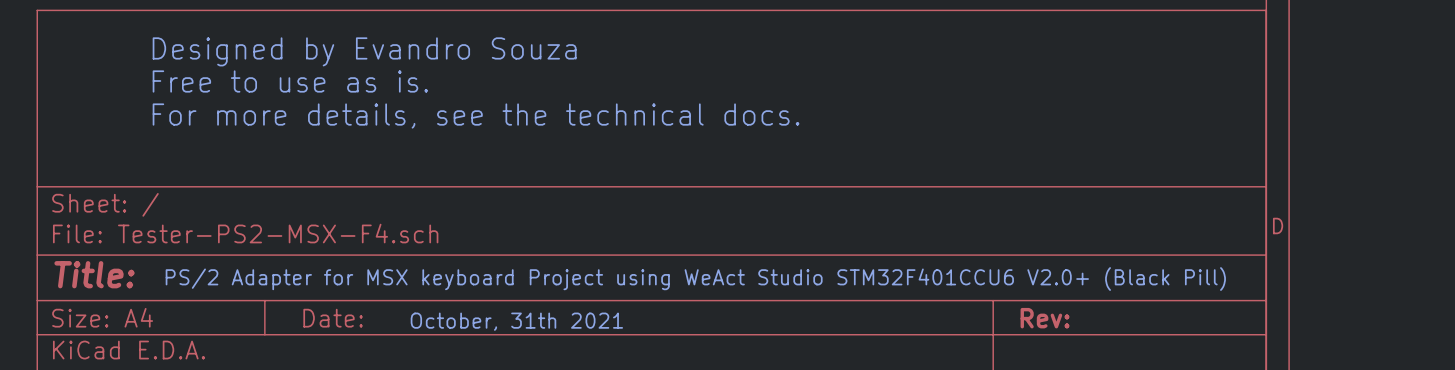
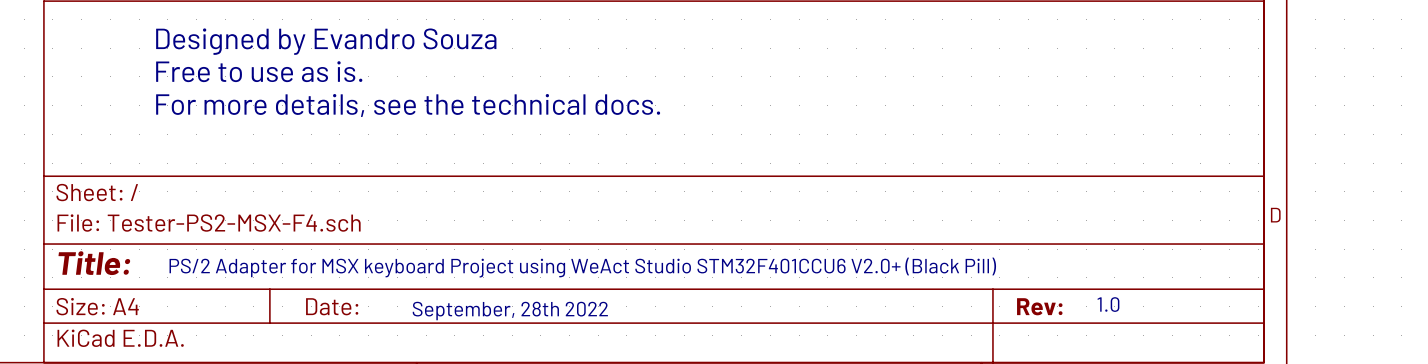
text: none -> 1.0 (1108, 304)
text: October, 31th 2021 (516, 321) -> September, 28th 2022 (510, 311)

